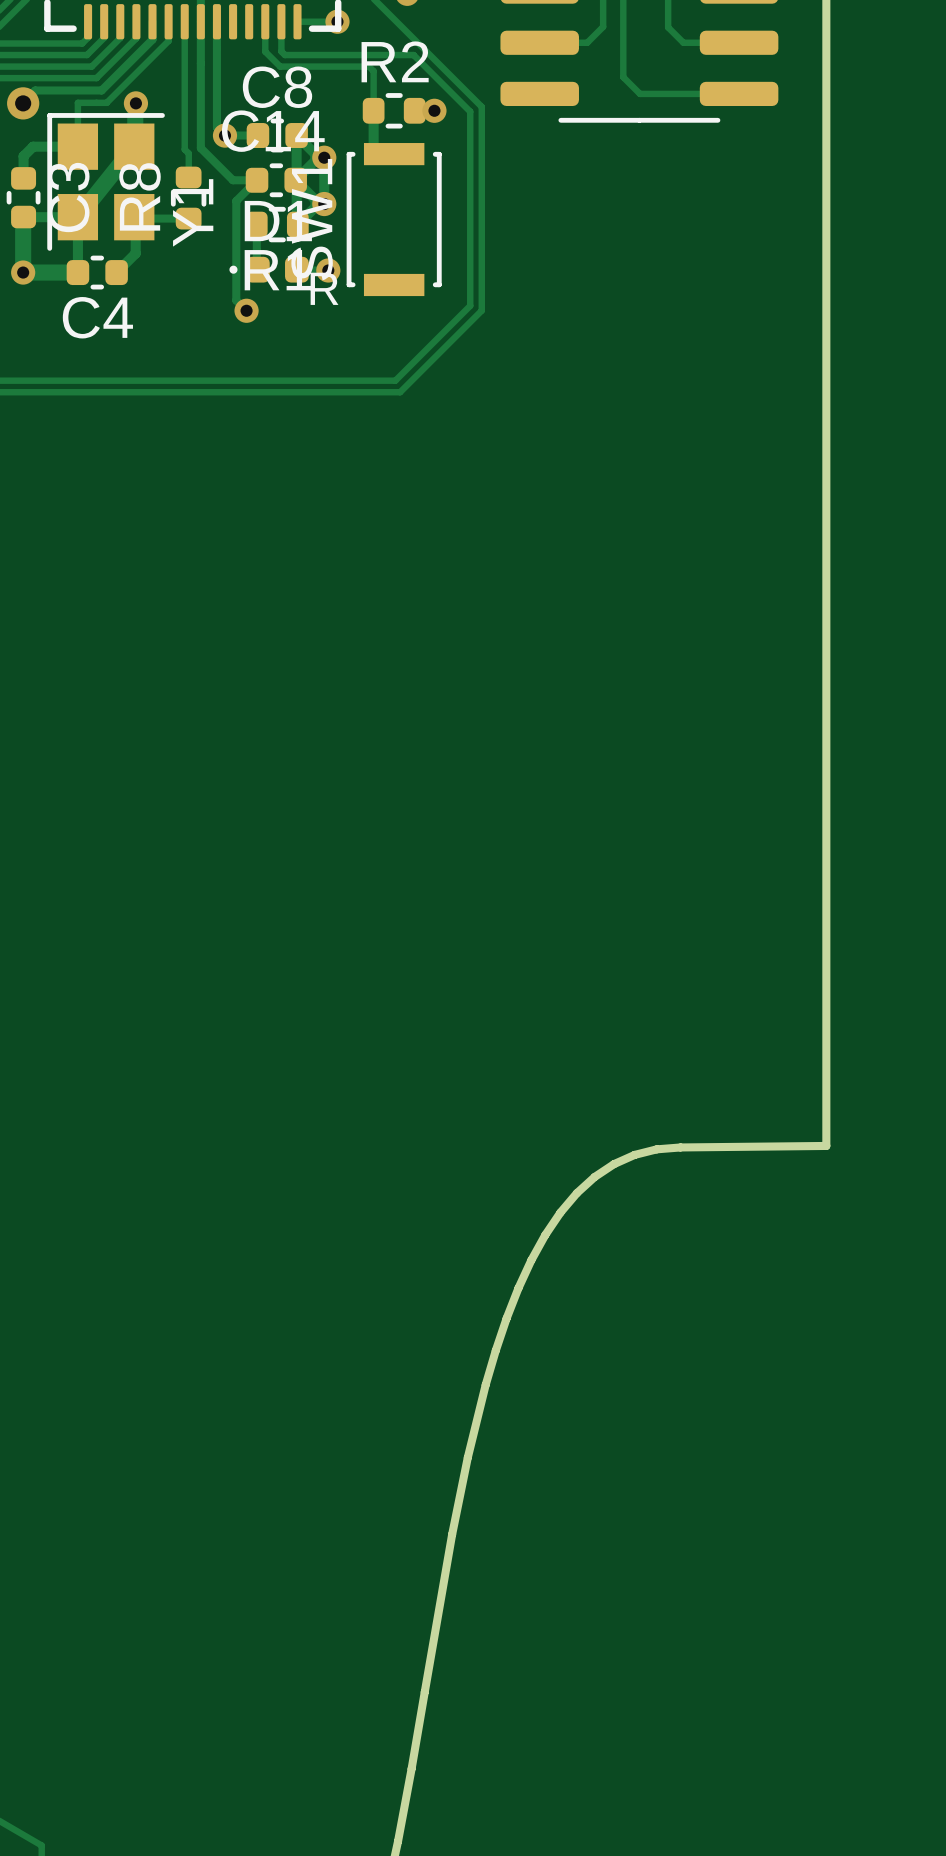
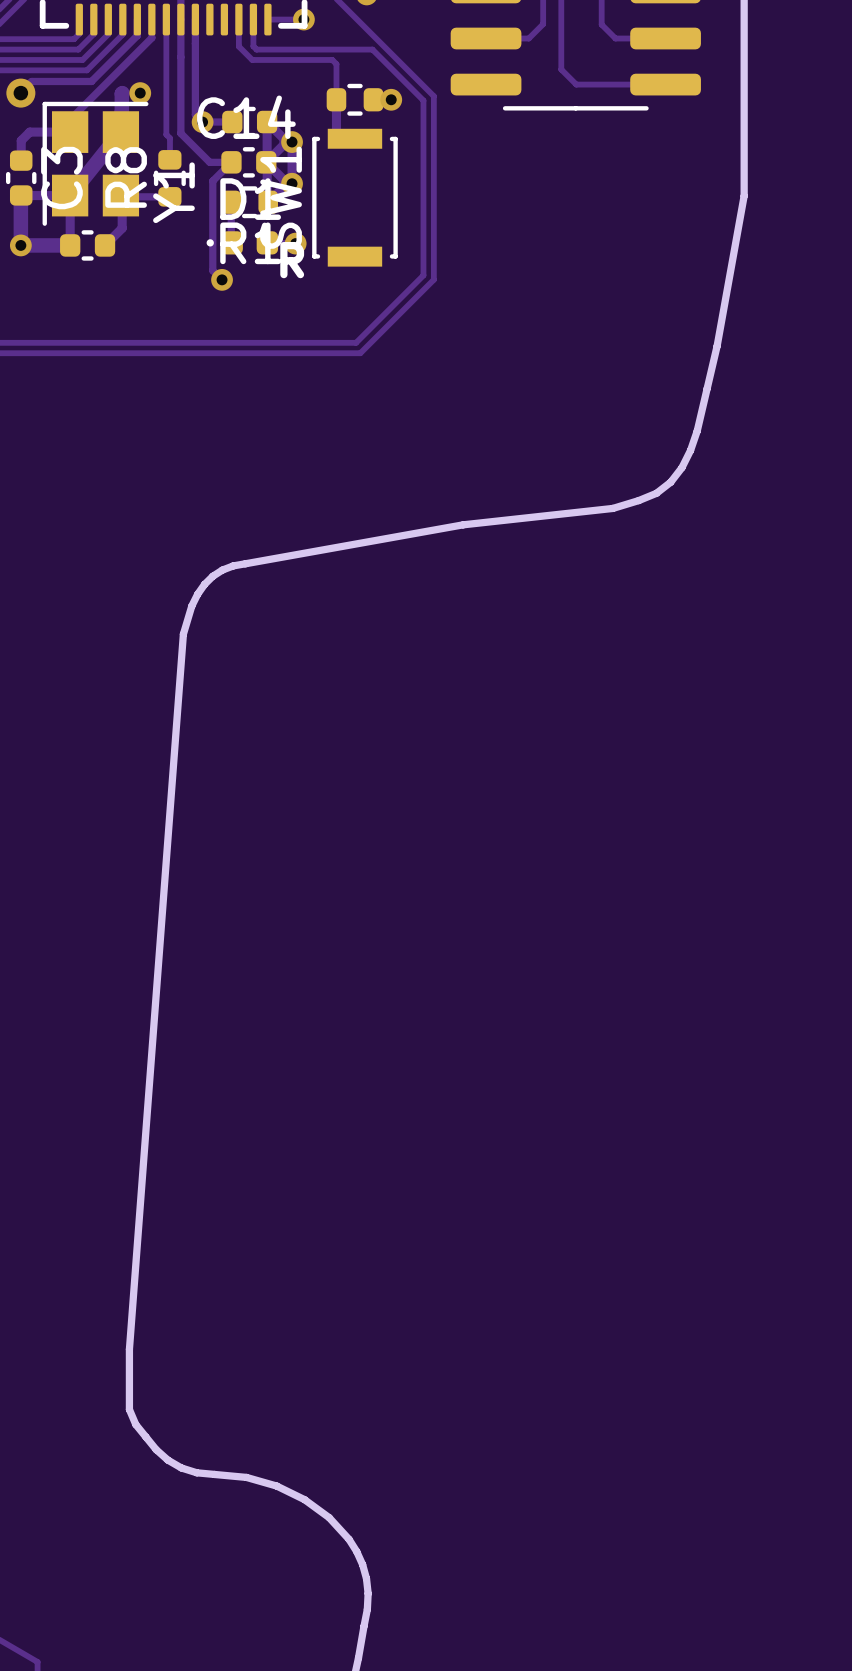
track: (168, 40) (106, 102) (77, 102) (77, 132) -> (151, 36) (70, 119)
R2 name: R2 (395, 61) -> none
C8 name: C8 (277, 87) -> none
via position: (135, 103) -> (140, 93)
board edge: (826, 217) (826, 1145) (680, 1147) (656, 1149) (634, 1154) (613, 1164) (594, 1176) (576, 1193) (545, 1234) (531, 1260) (506, 1318) (485, 1384) (467, 1457) (452, 1534) (398, 1841) -> (744, 195) (717, 346) (697, 431) (681, 467) (670, 482) (656, 493) (612, 508) (463, 524) (233, 565) (222, 570) (204, 584) (191, 606) (183, 634) (129, 1349) (129, 1409) (135, 1424) (156, 1449) (167, 1460) (181, 1467) (196, 1472) (246, 1477) (276, 1486) (304, 1499) (329, 1517) (349, 1539) (356, 1551) (366, 1578) (367, 1609) (358, 1658)
C4 name: C4 (97, 317) -> none

